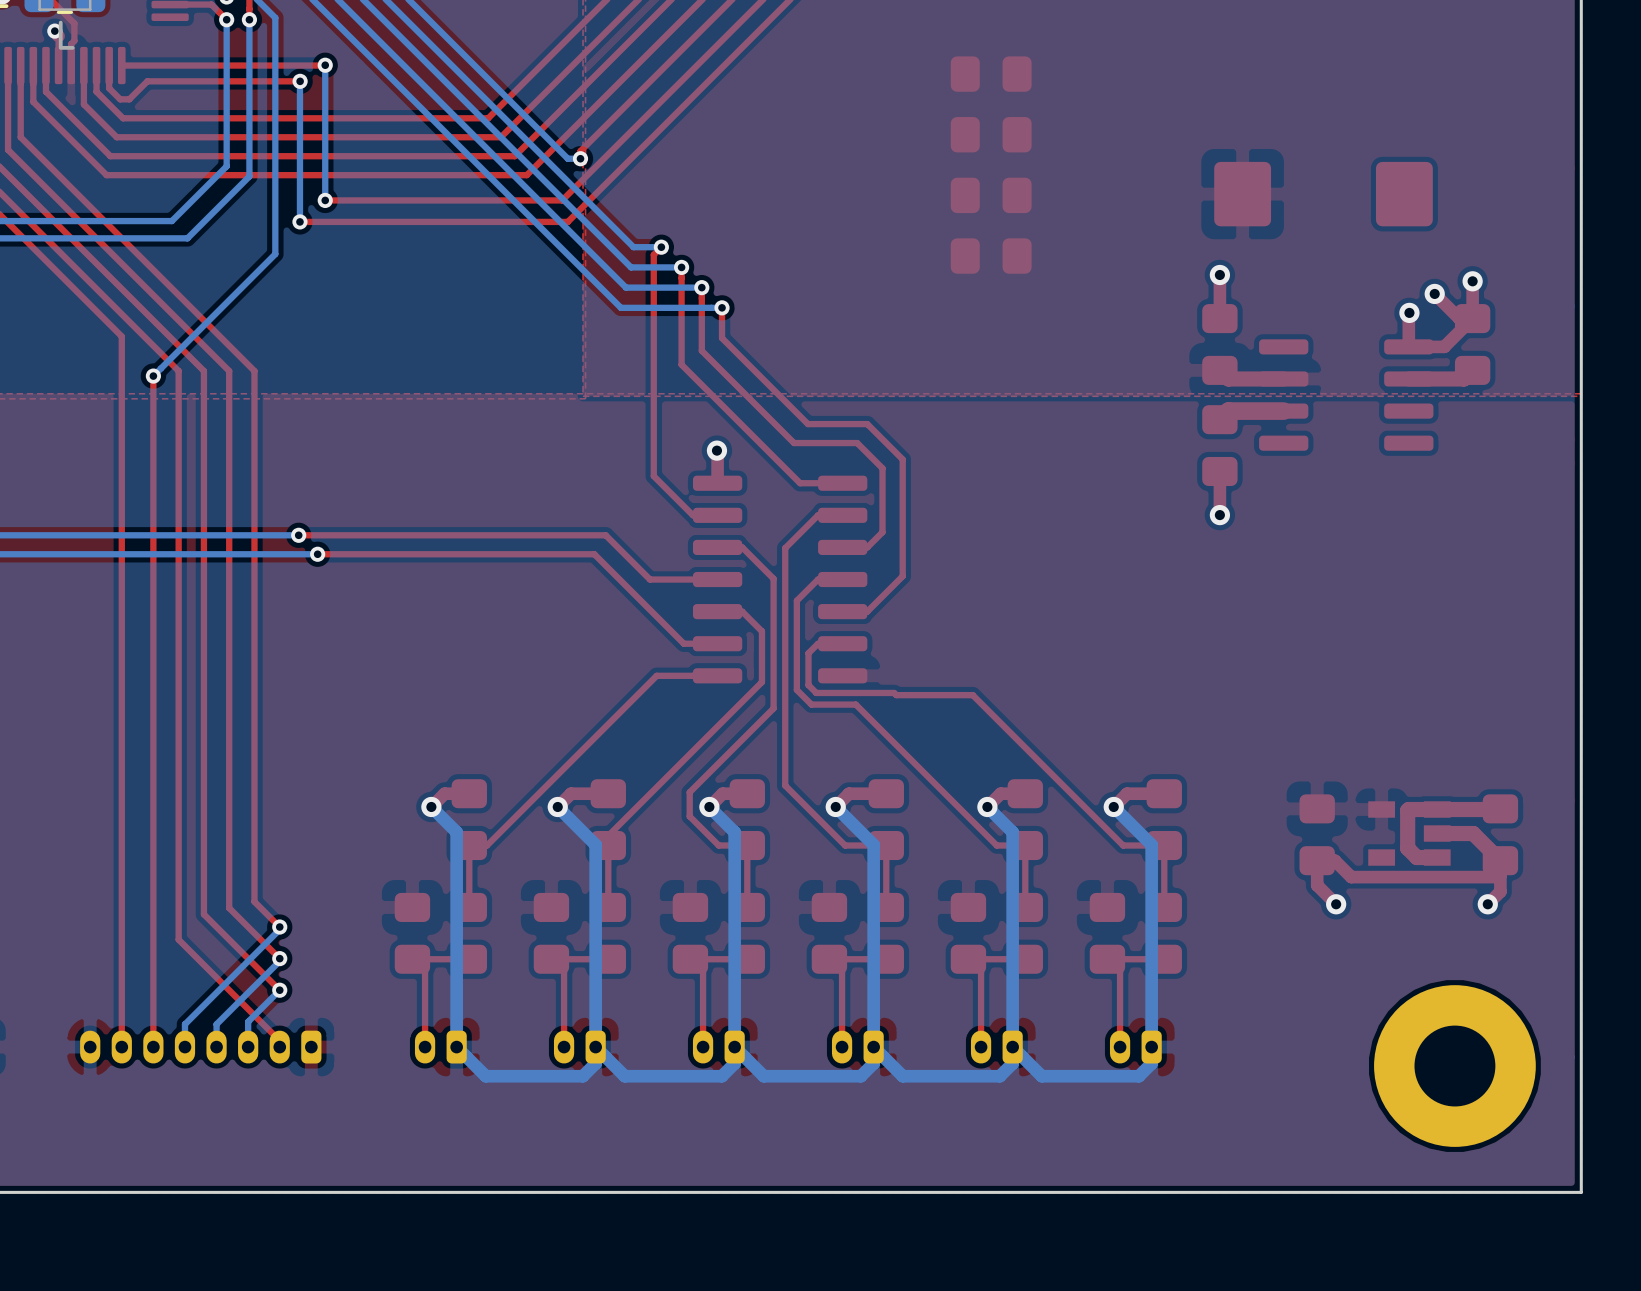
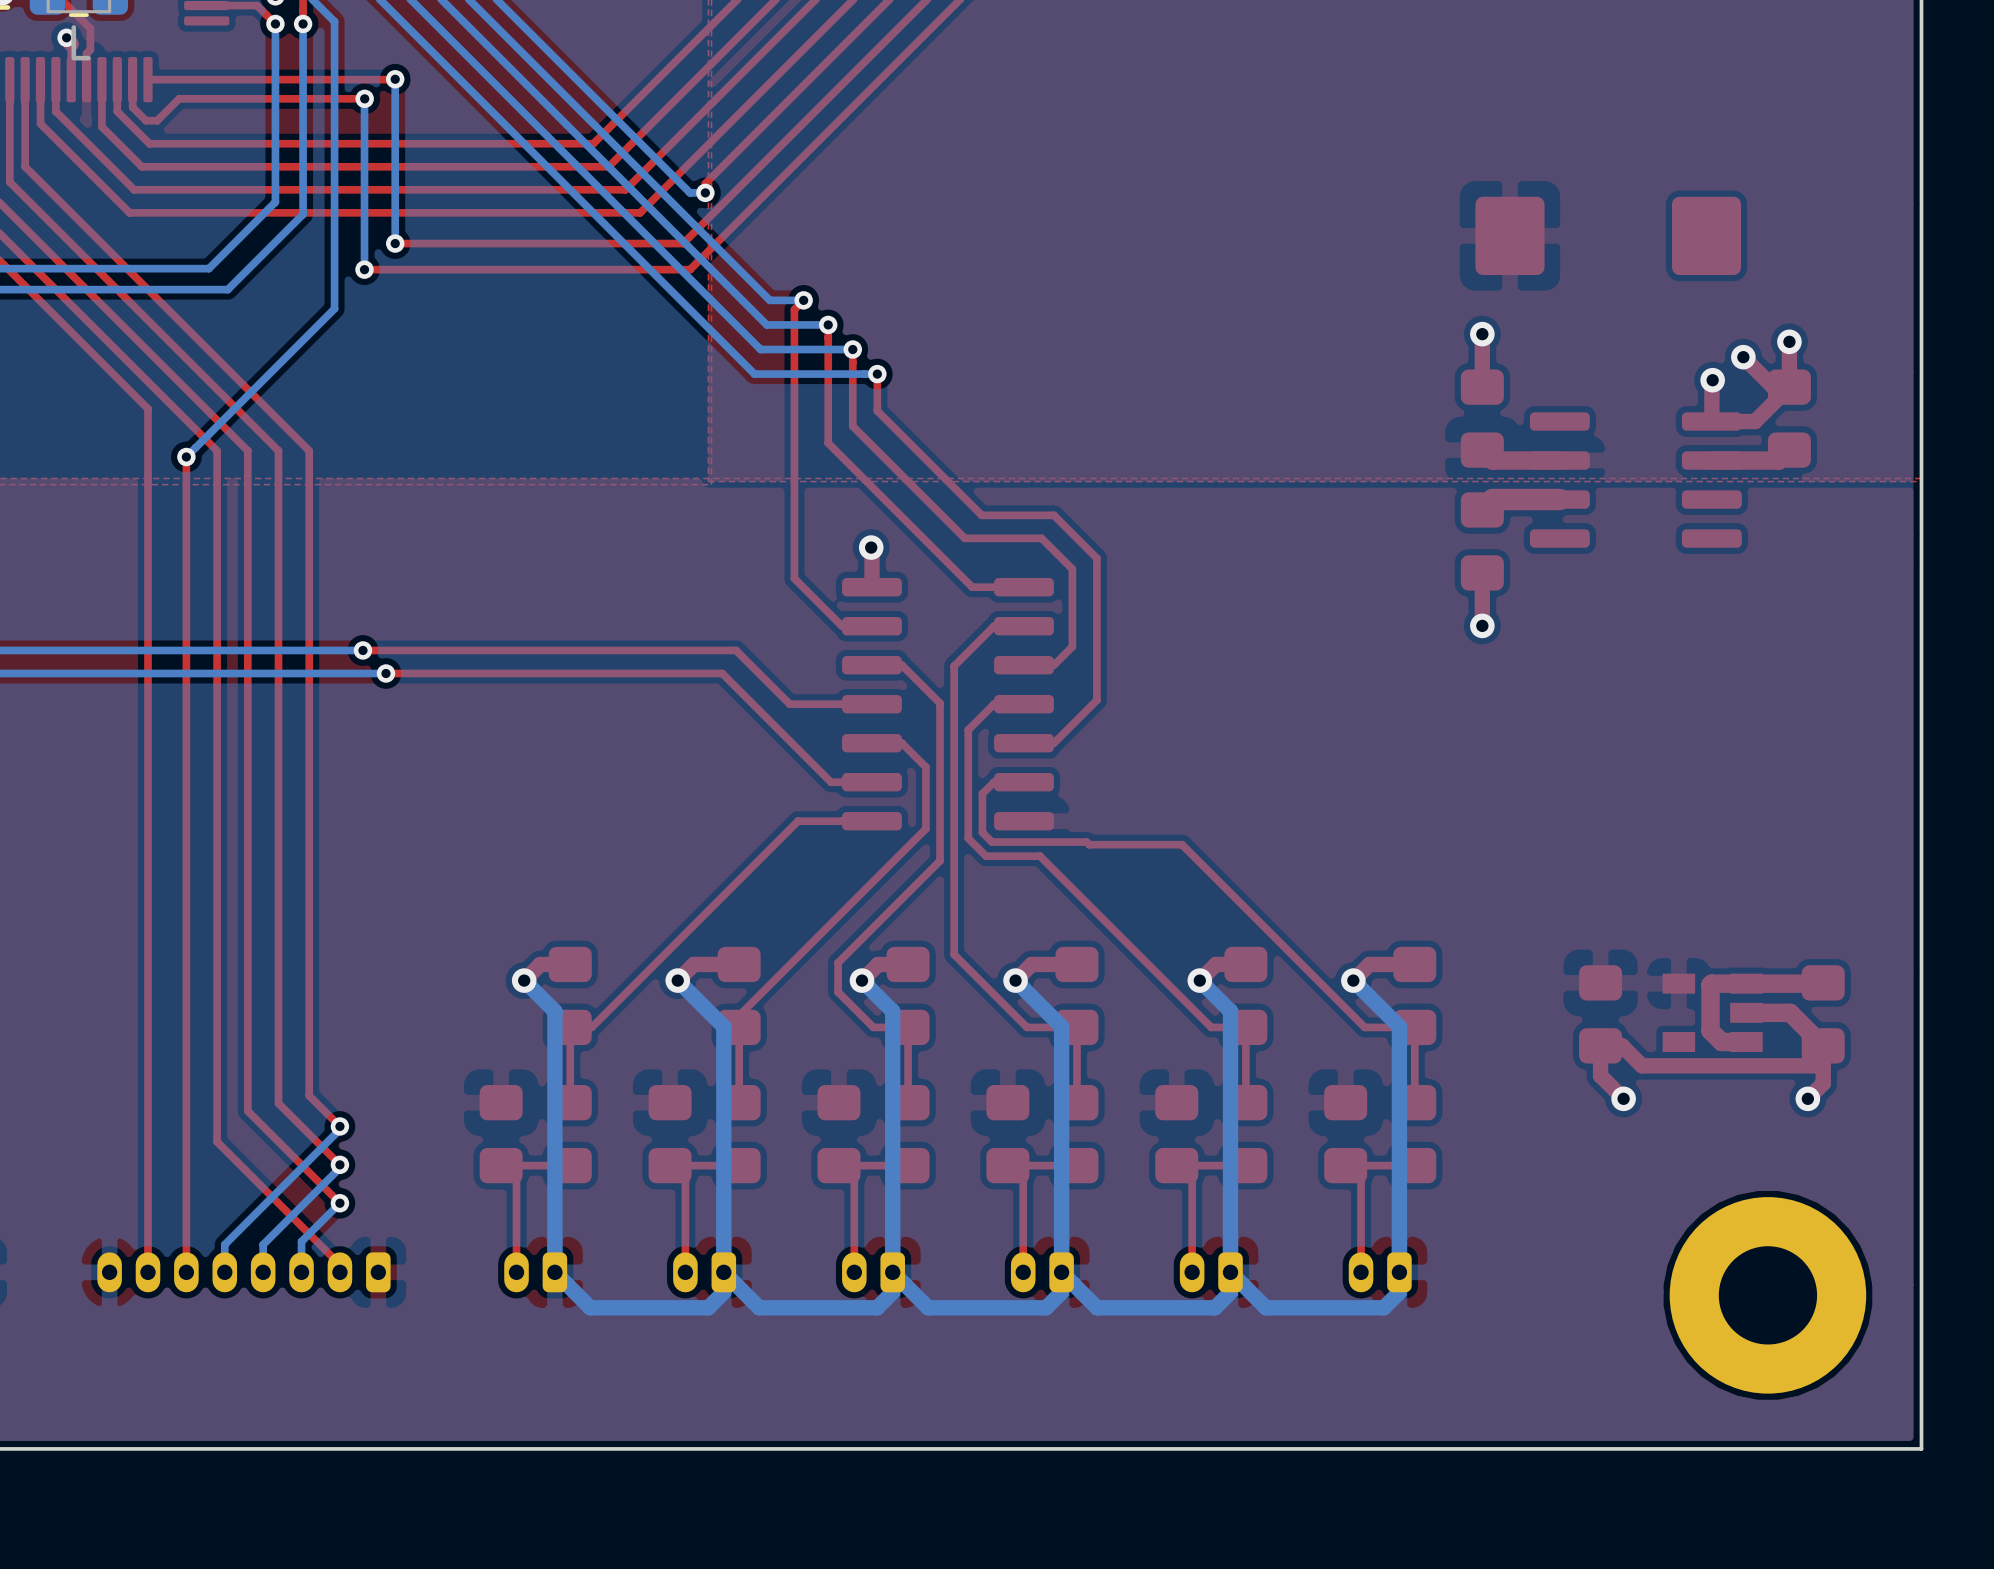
part: (991, 74) -> none
part: (991, 134) -> none
part: (991, 195) -> none
part: (991, 256) -> none

